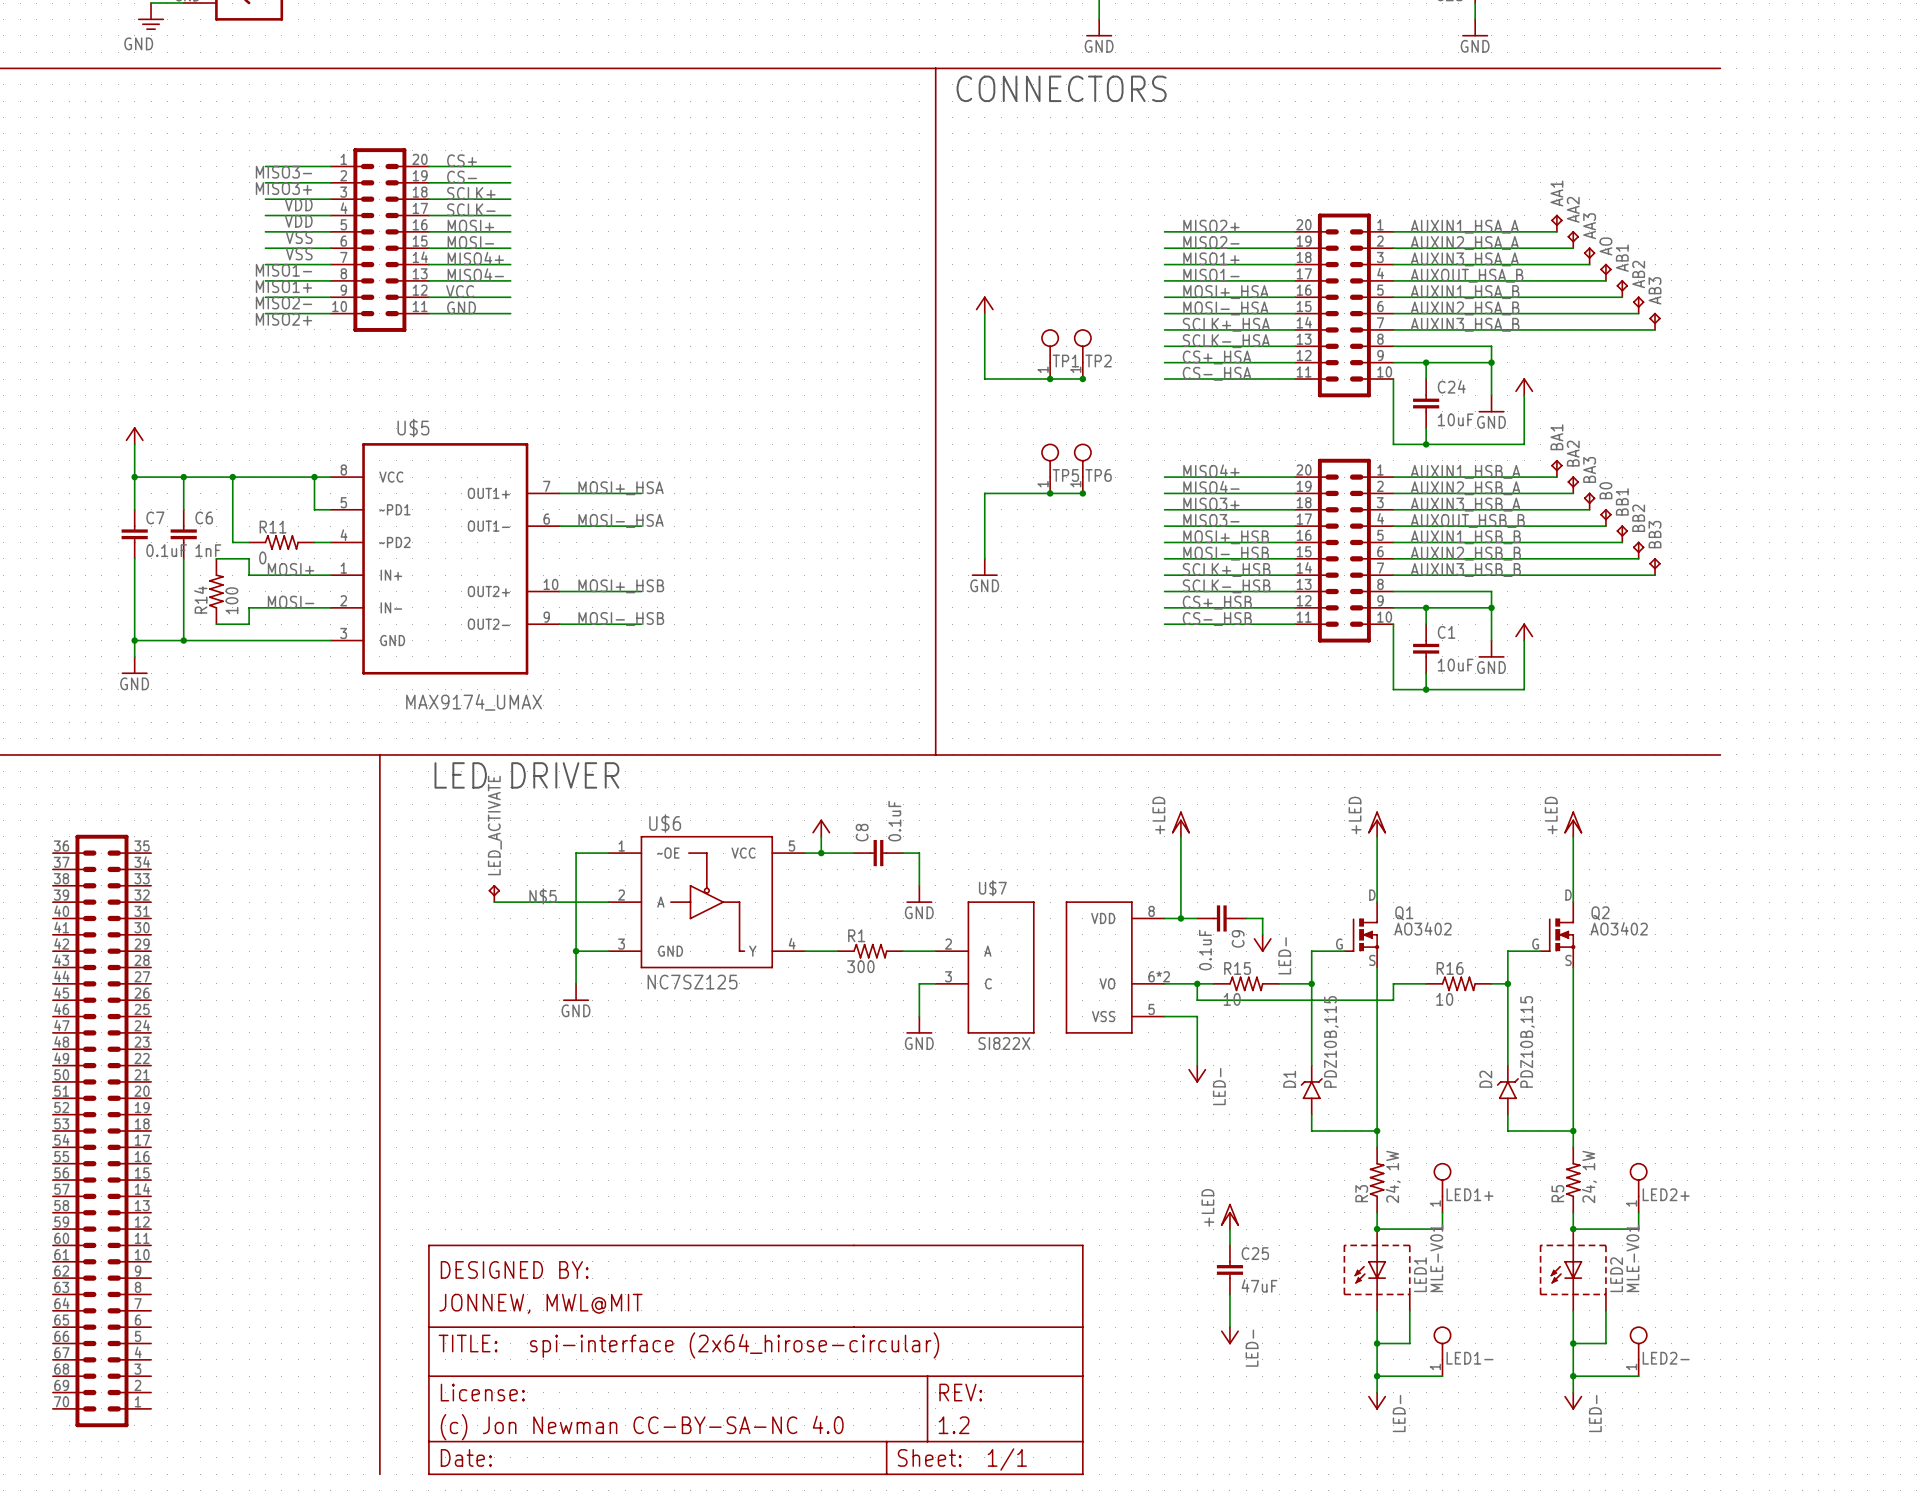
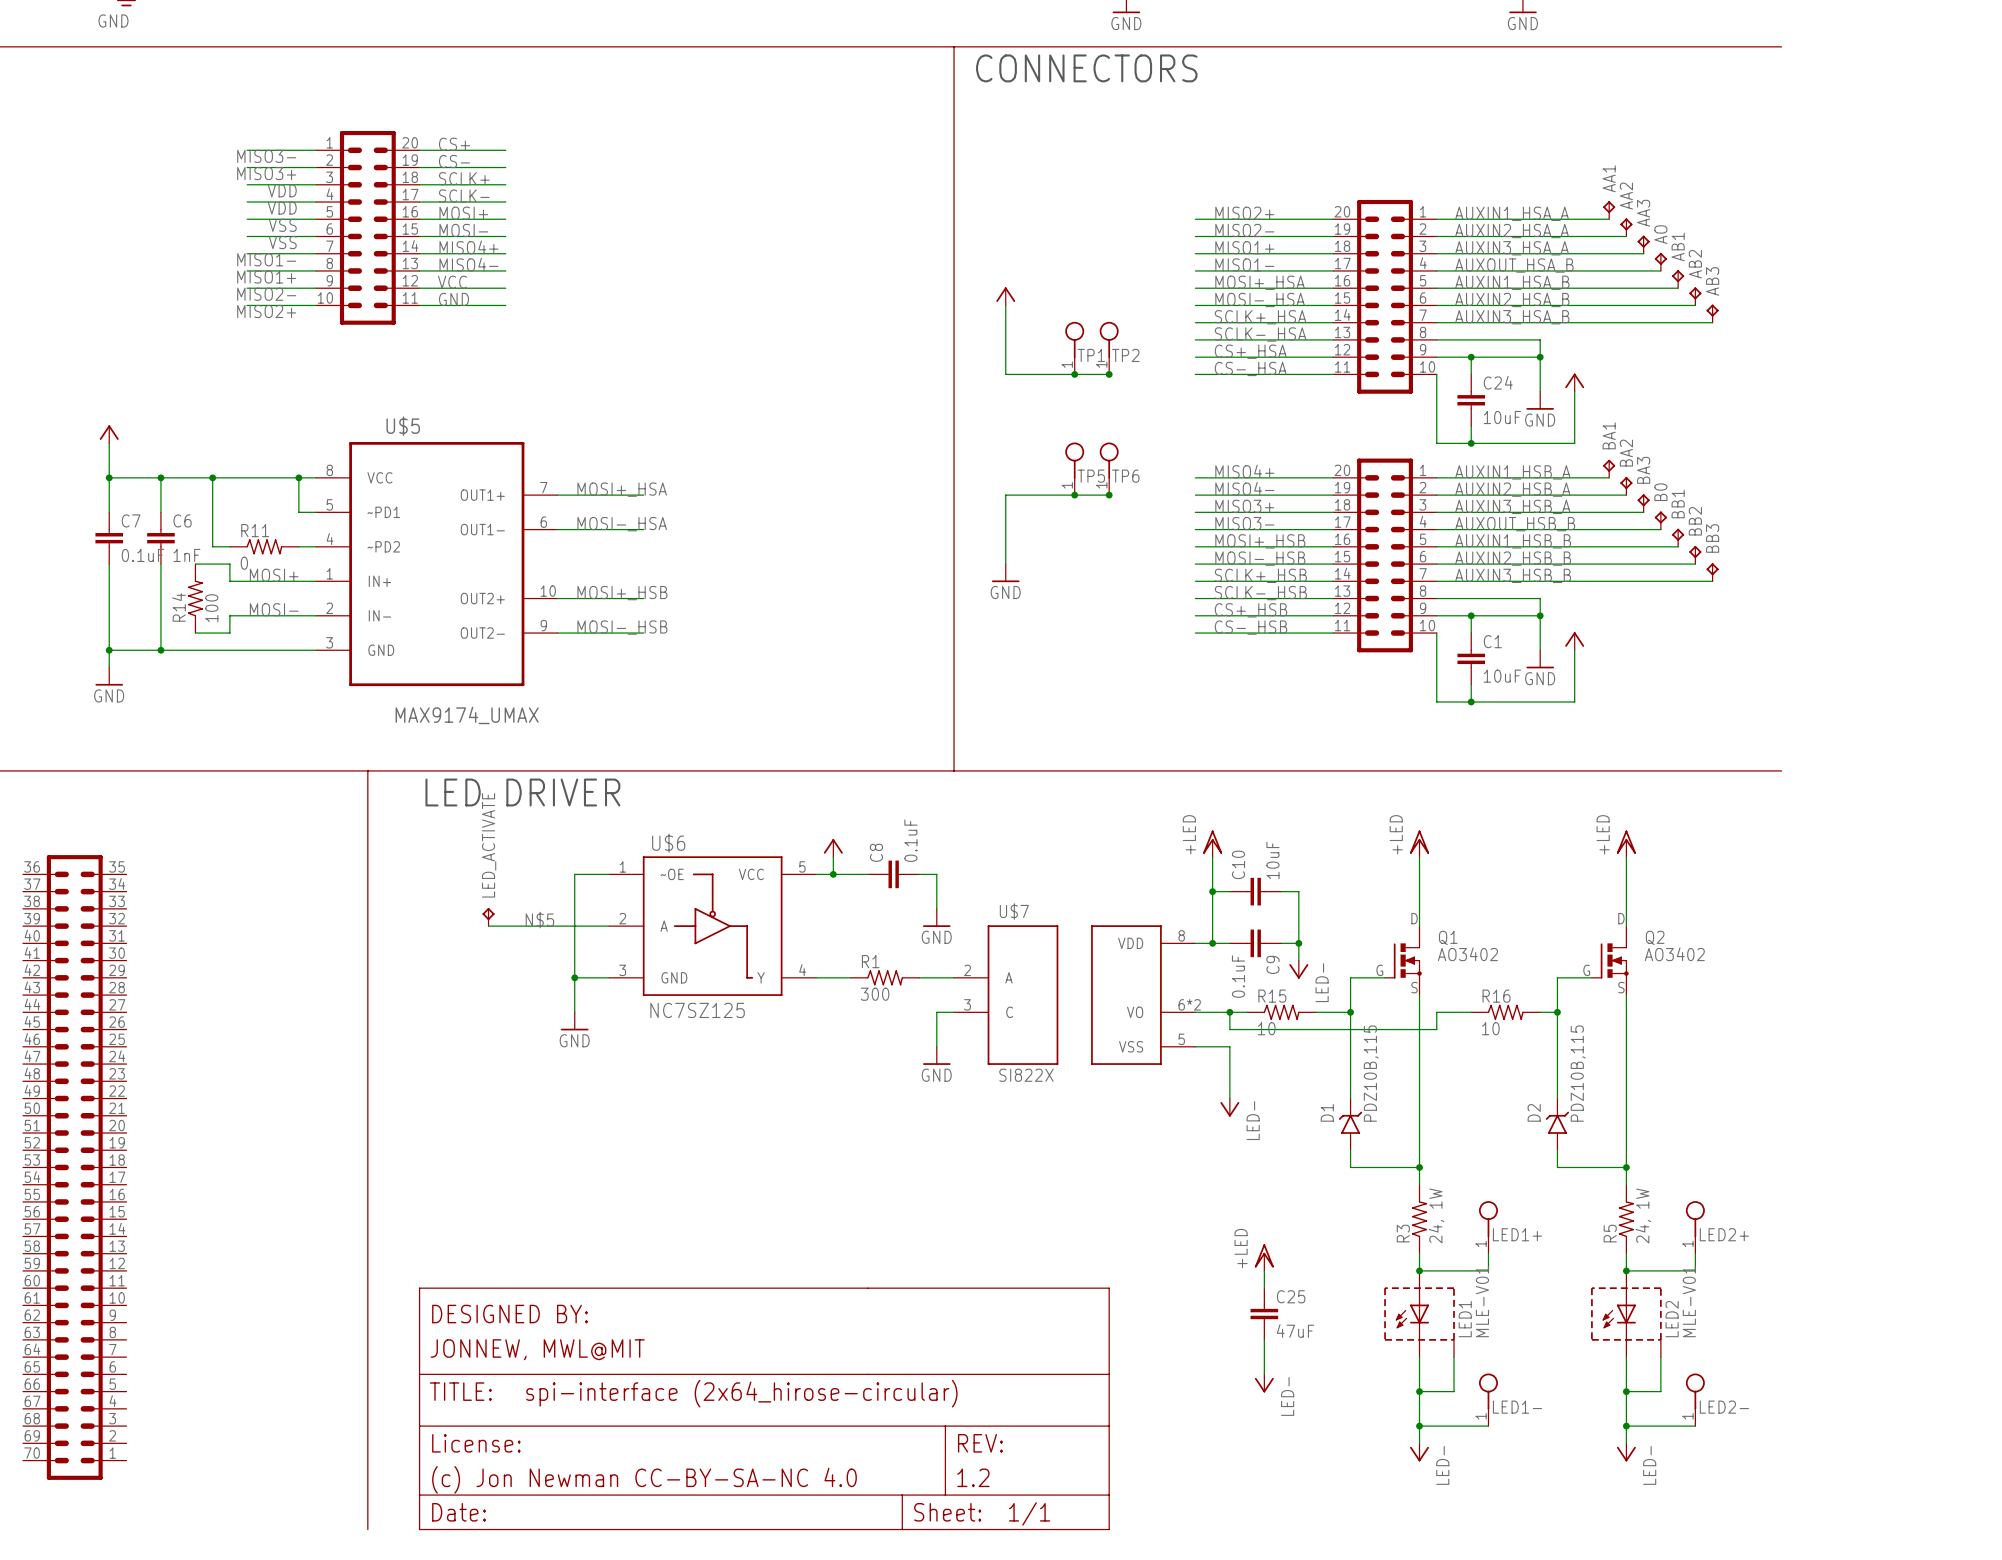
wire: none -> (1212, 891) (1229, 891)
junction: none -> (1212, 891)
C10: none -> 10uF (1255, 891)
wire: none -> (1281, 891) (1298, 891) (1298, 943)
junction: none -> (1298, 943)

